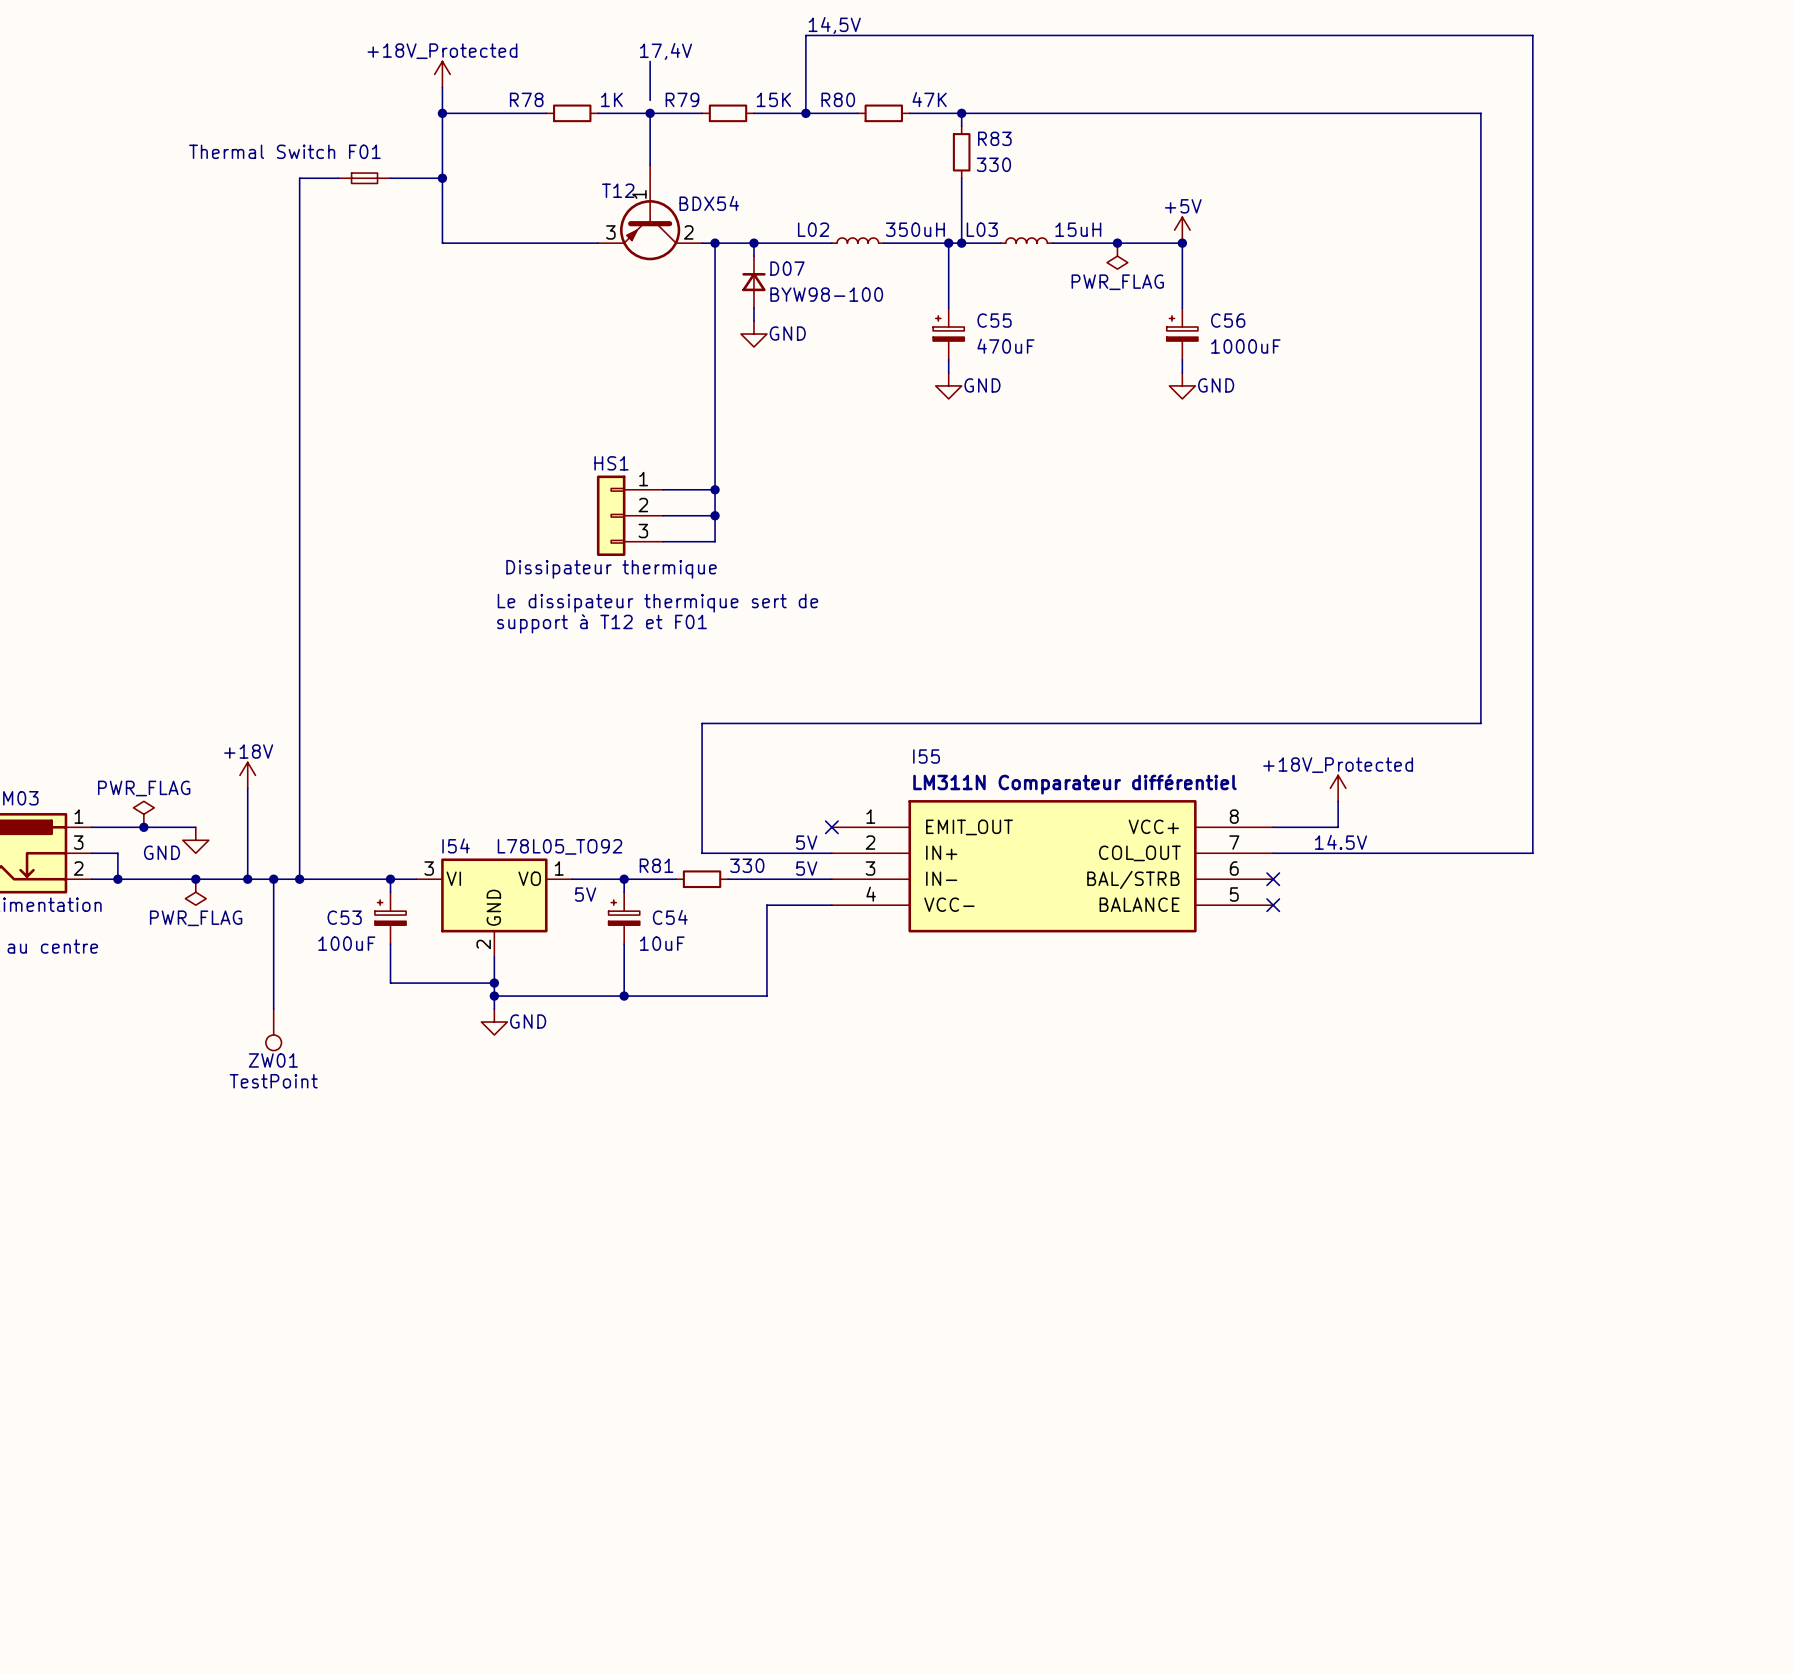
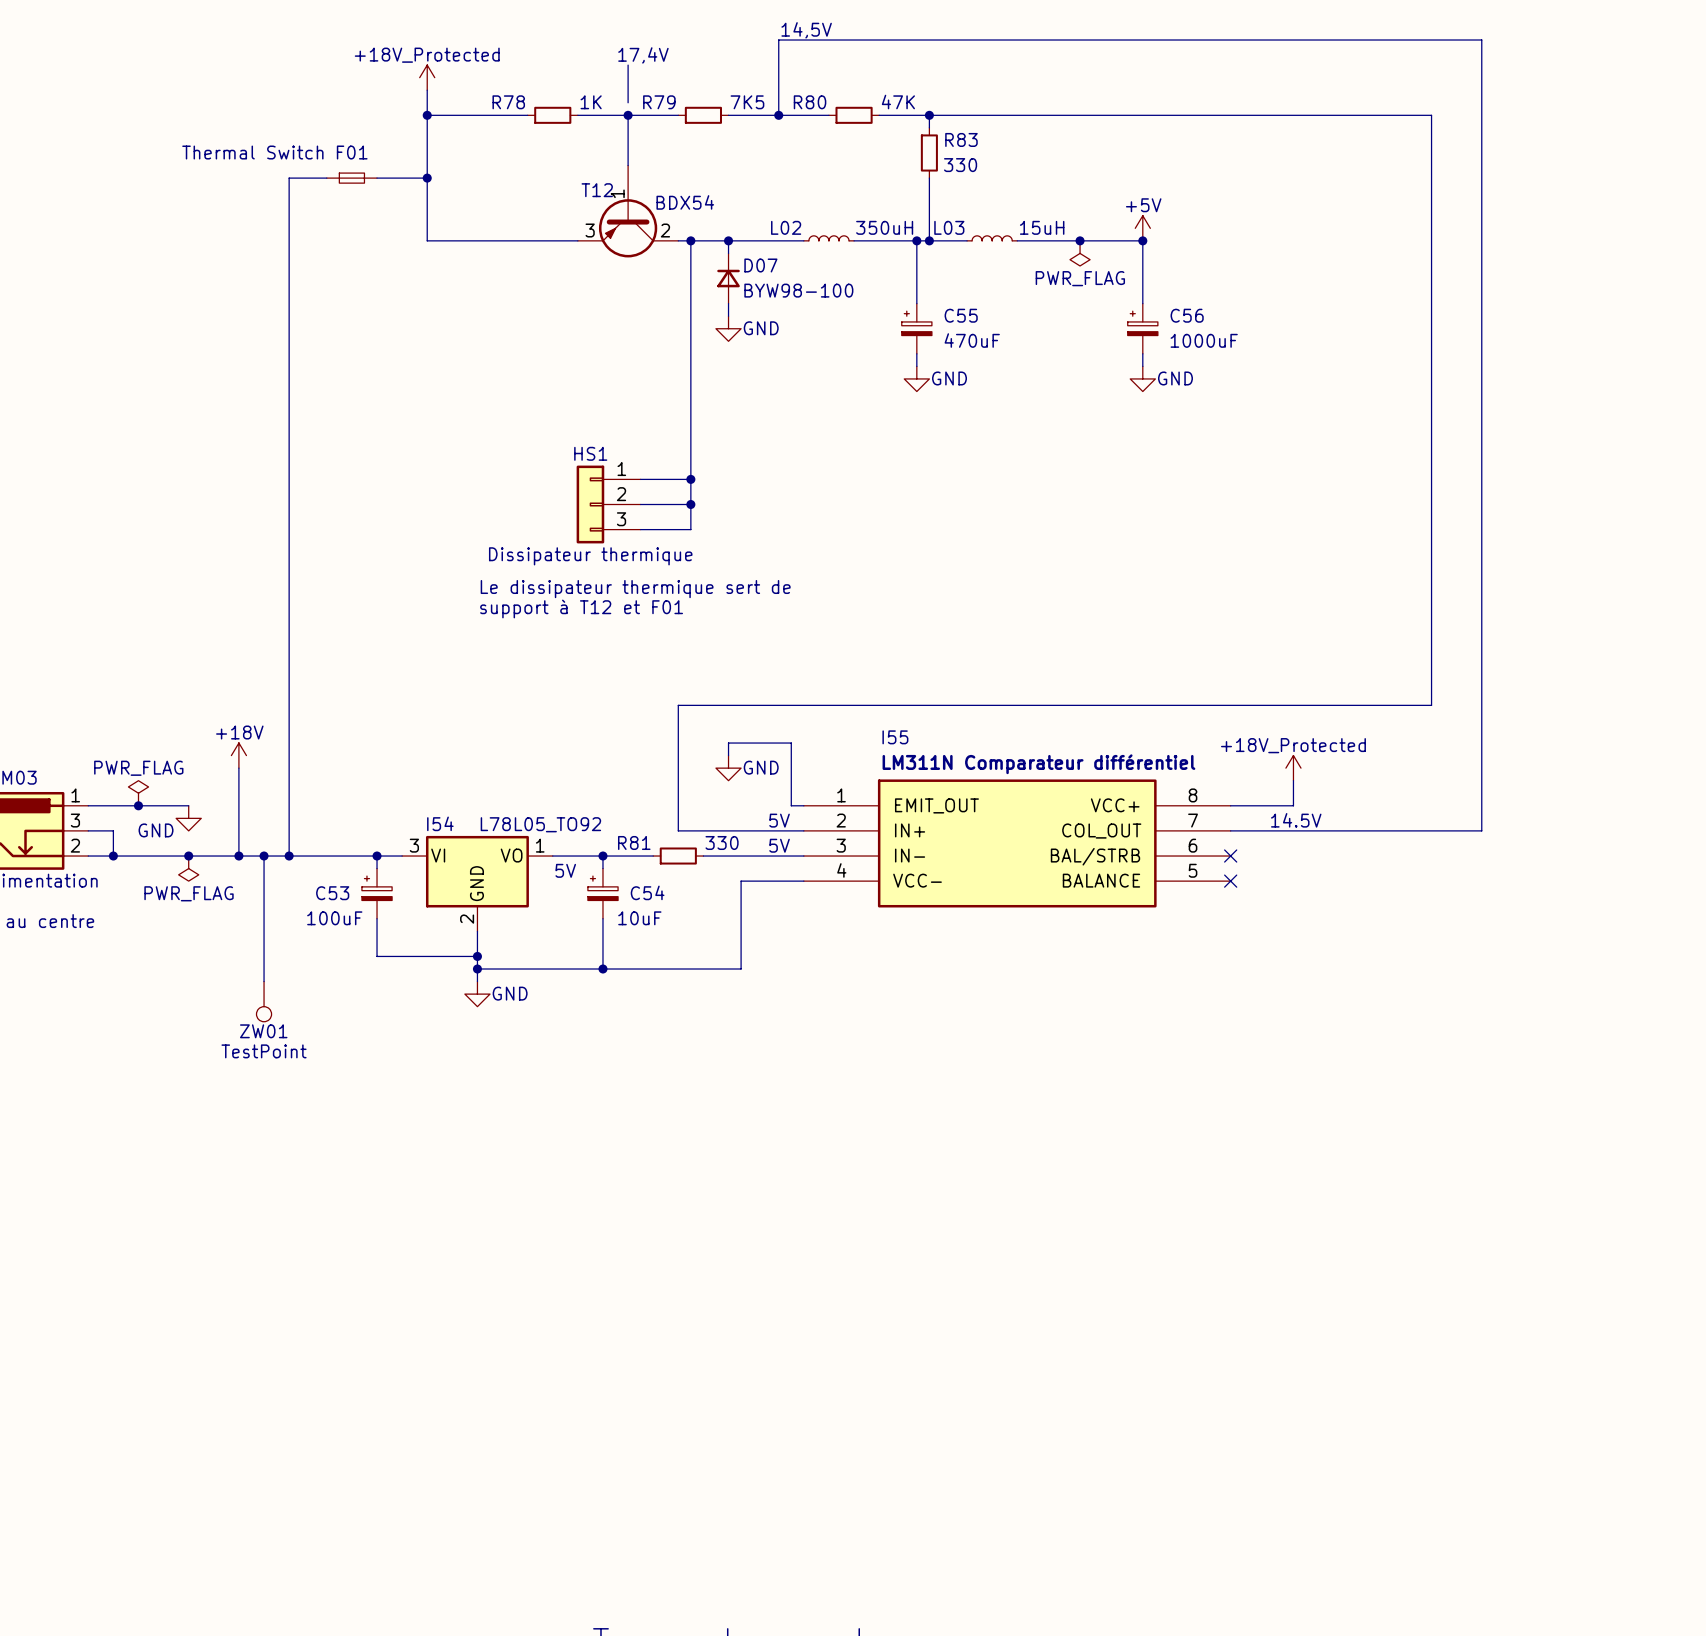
R79 value: 15K (773, 99) -> 7K5 (747, 102)
wire: none -> (728, 755) (728, 743) (791, 743) (791, 805) (803, 805)
power symbol: none -> GND (728, 768)
no-connect mark: (831, 827) -> none

